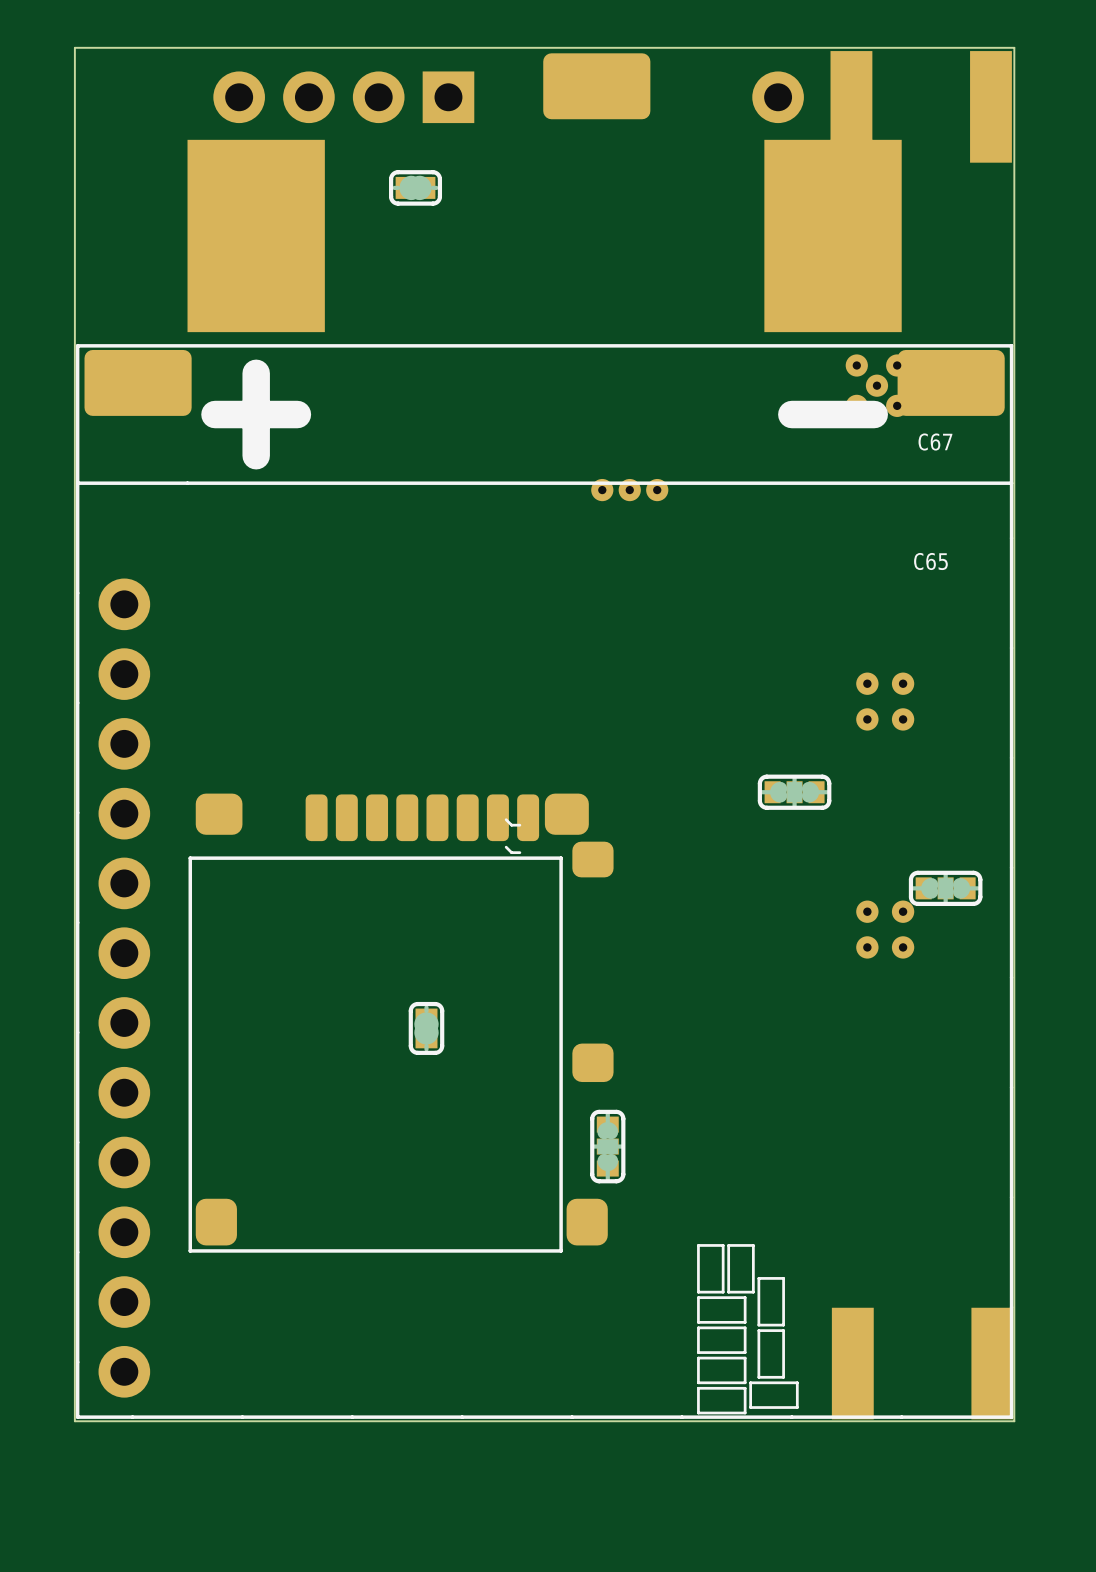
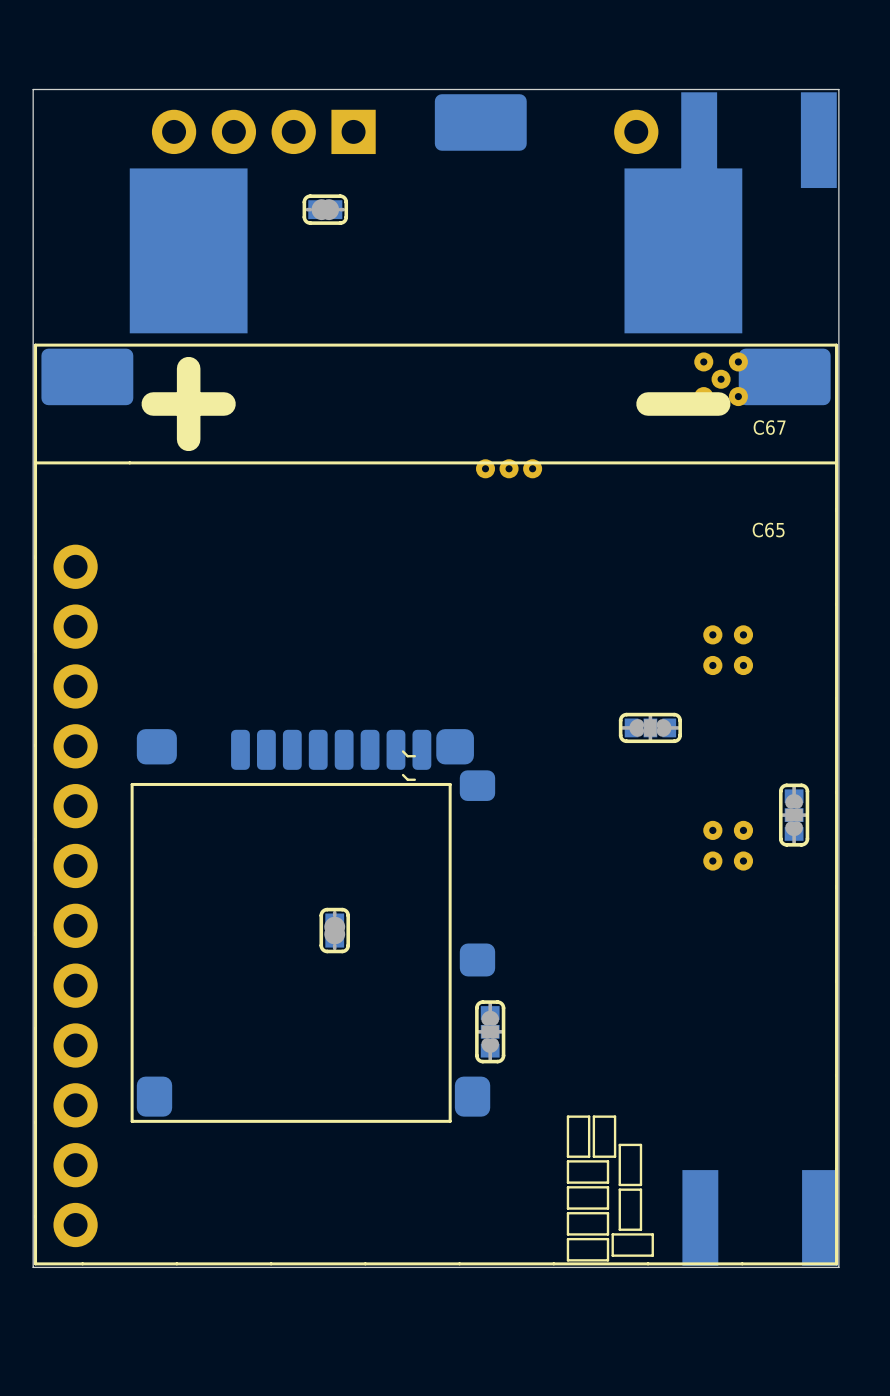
part rotation: 0° (945, 888) -> 90° clockwise (794, 815)

